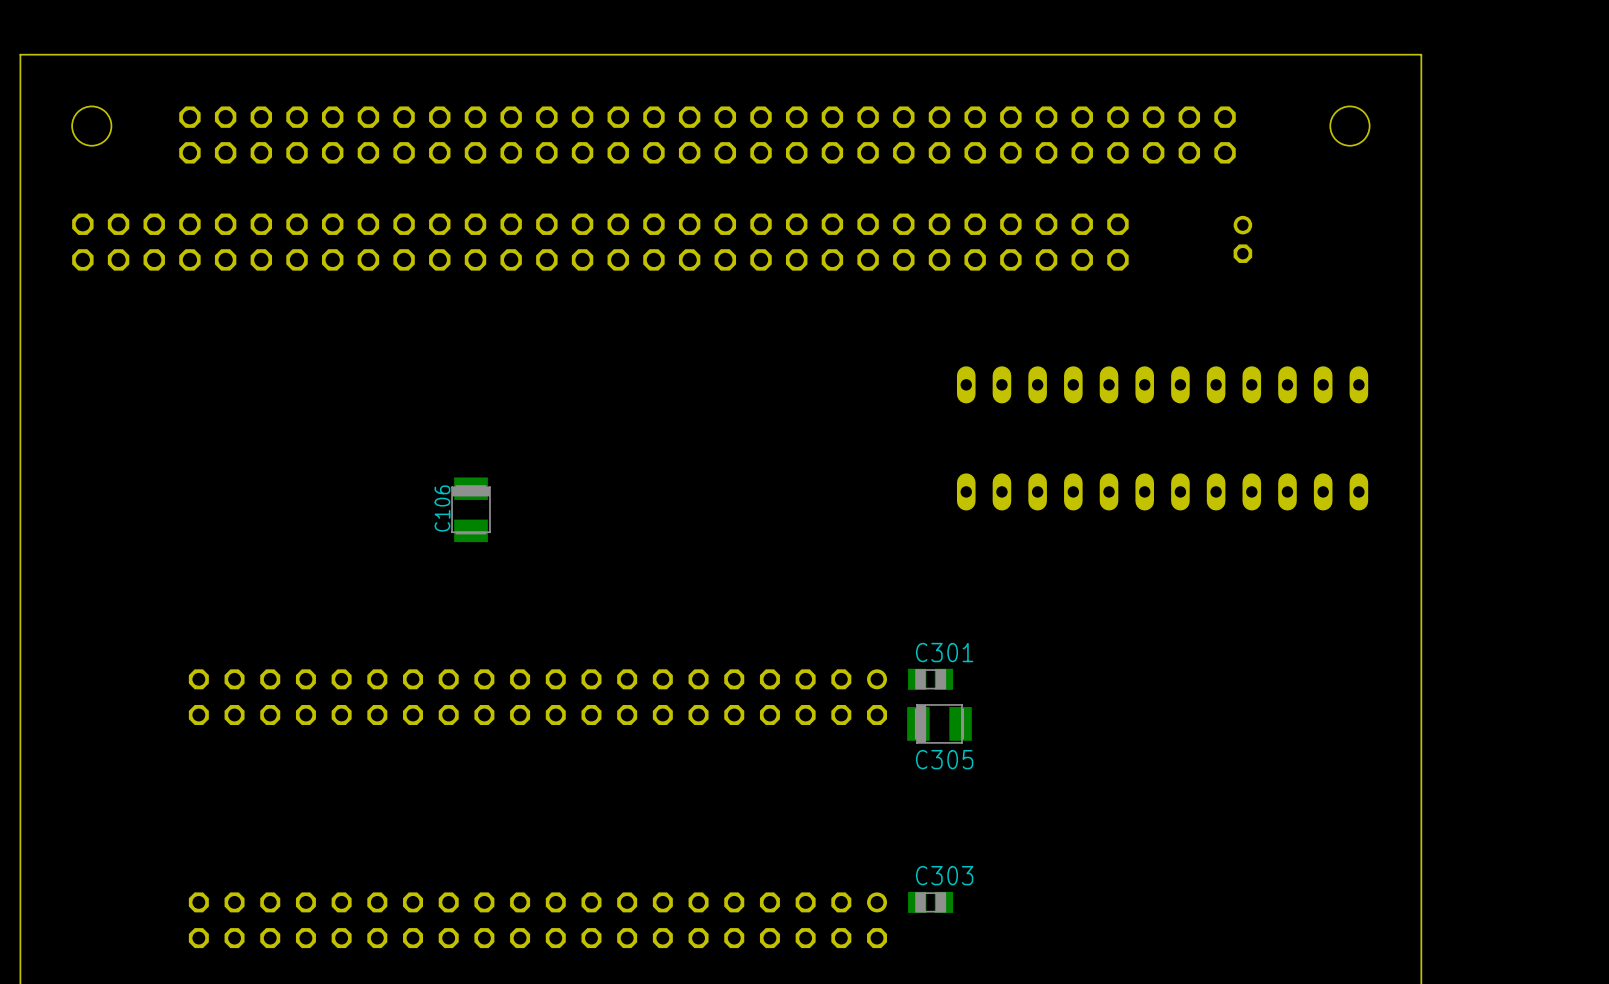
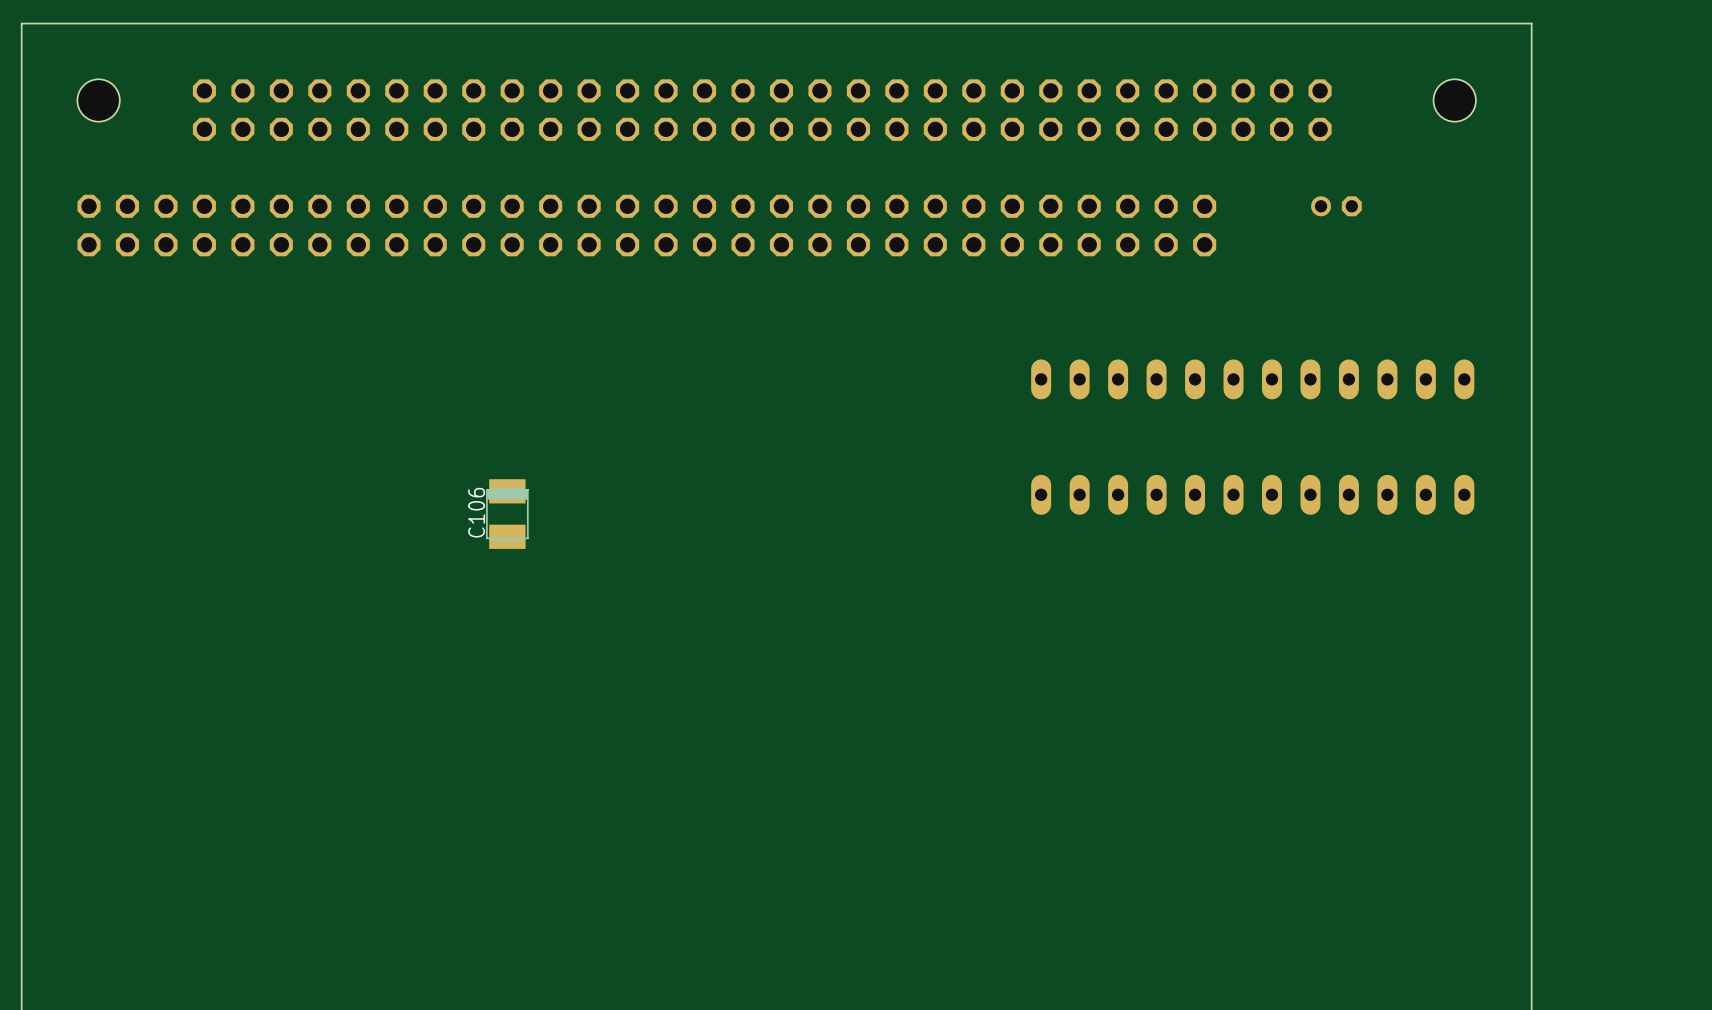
part rotation: 0° (1242, 239) -> 90° counterclockwise (1336, 206)
C301: (930, 679) -> none
part: (537, 697) -> none
C305: (939, 723) -> none
C303: (930, 902) -> none
part: (537, 920) -> none

